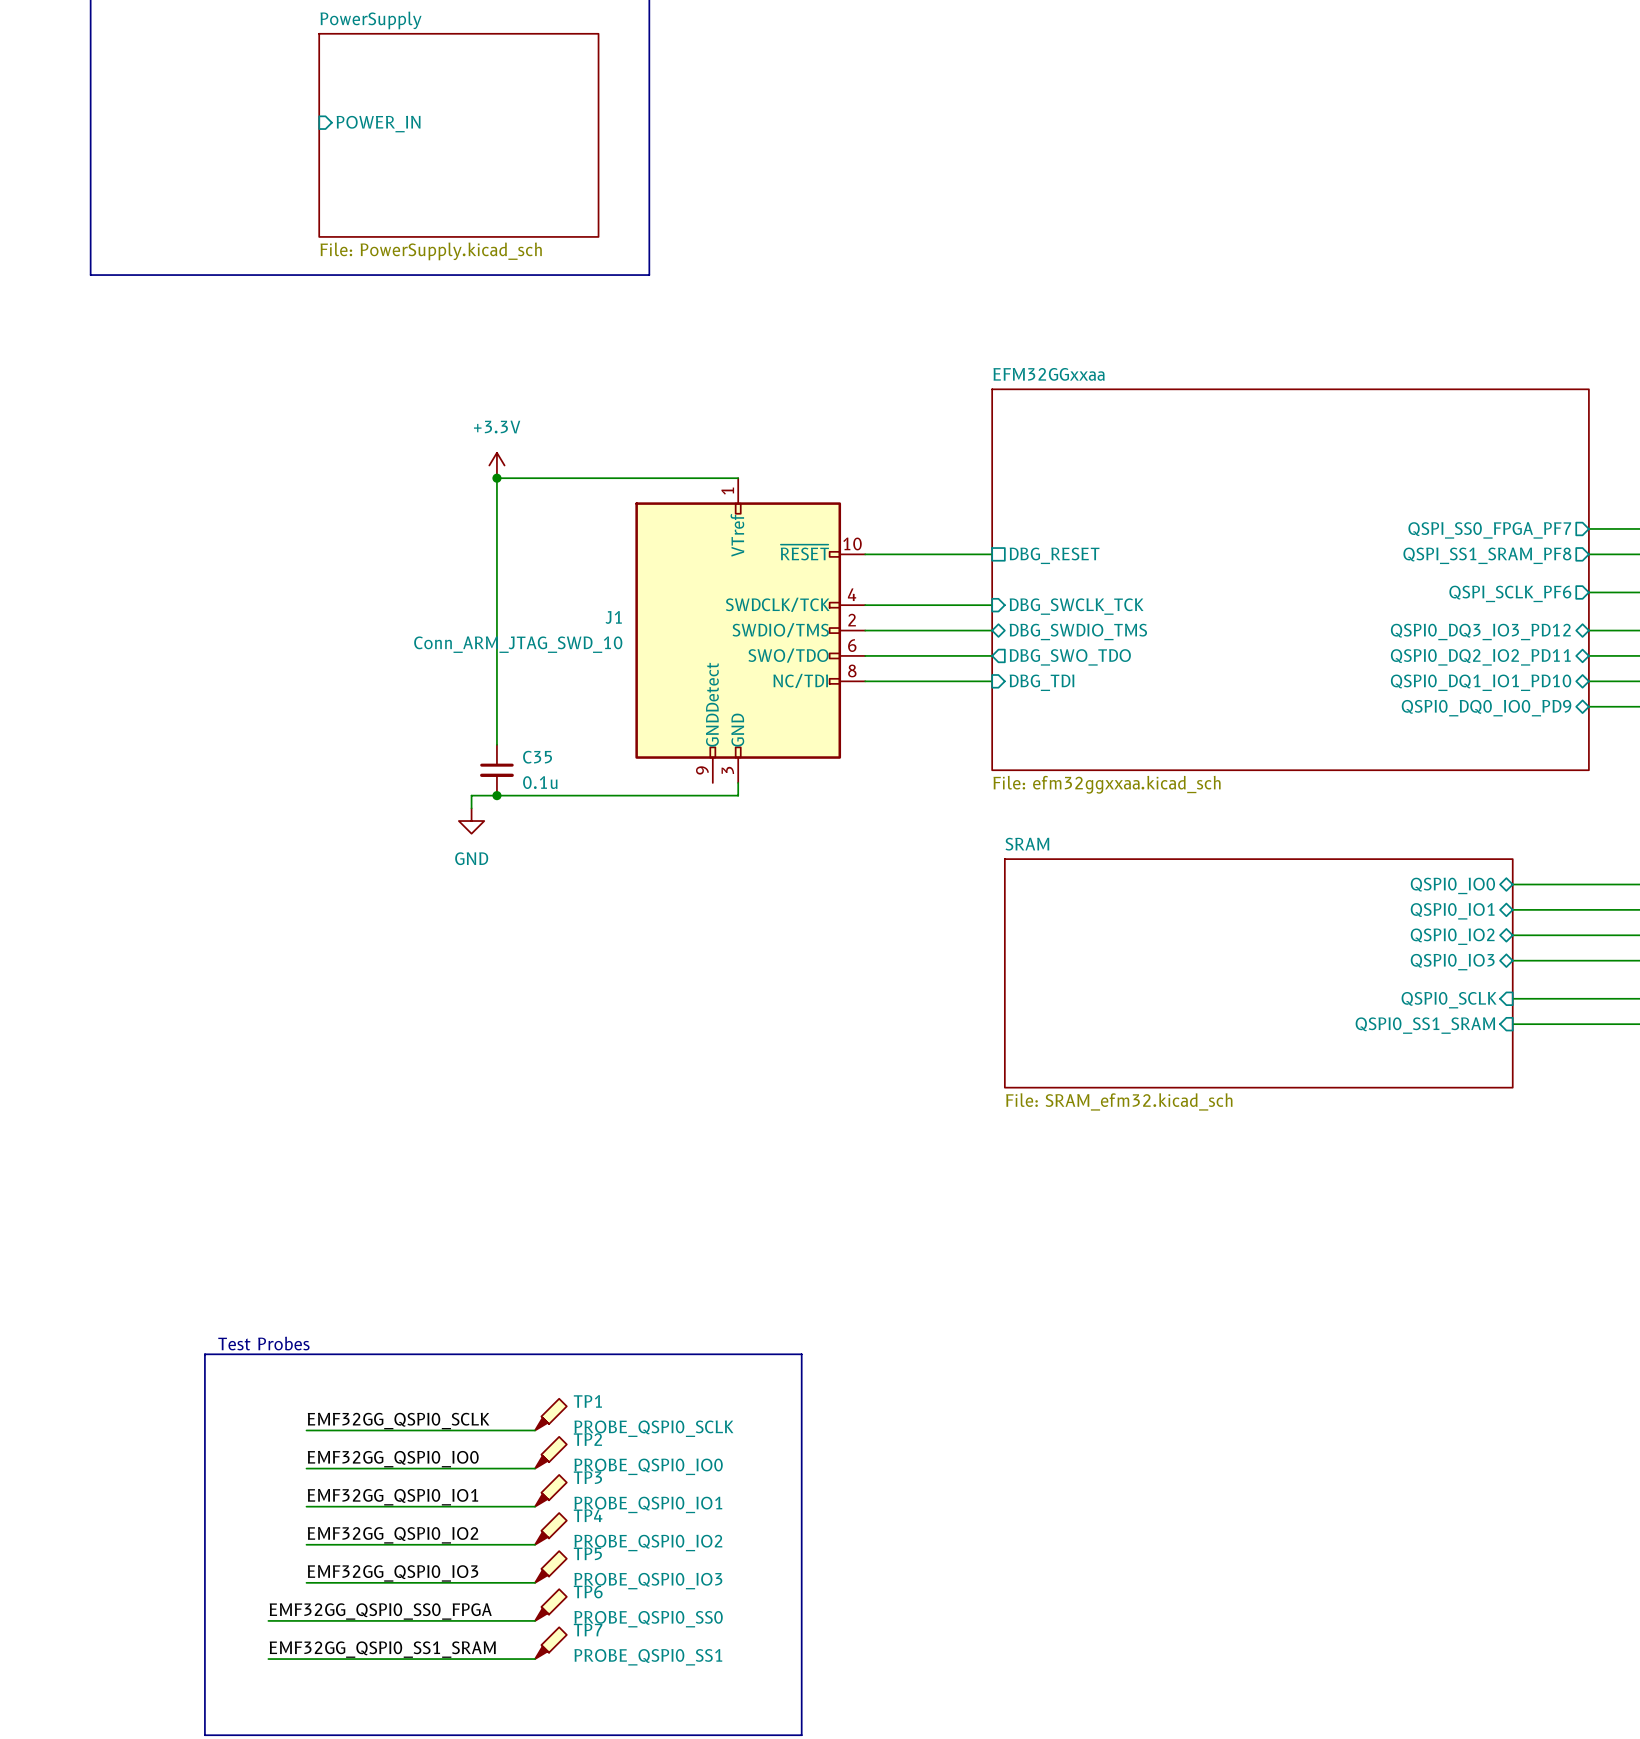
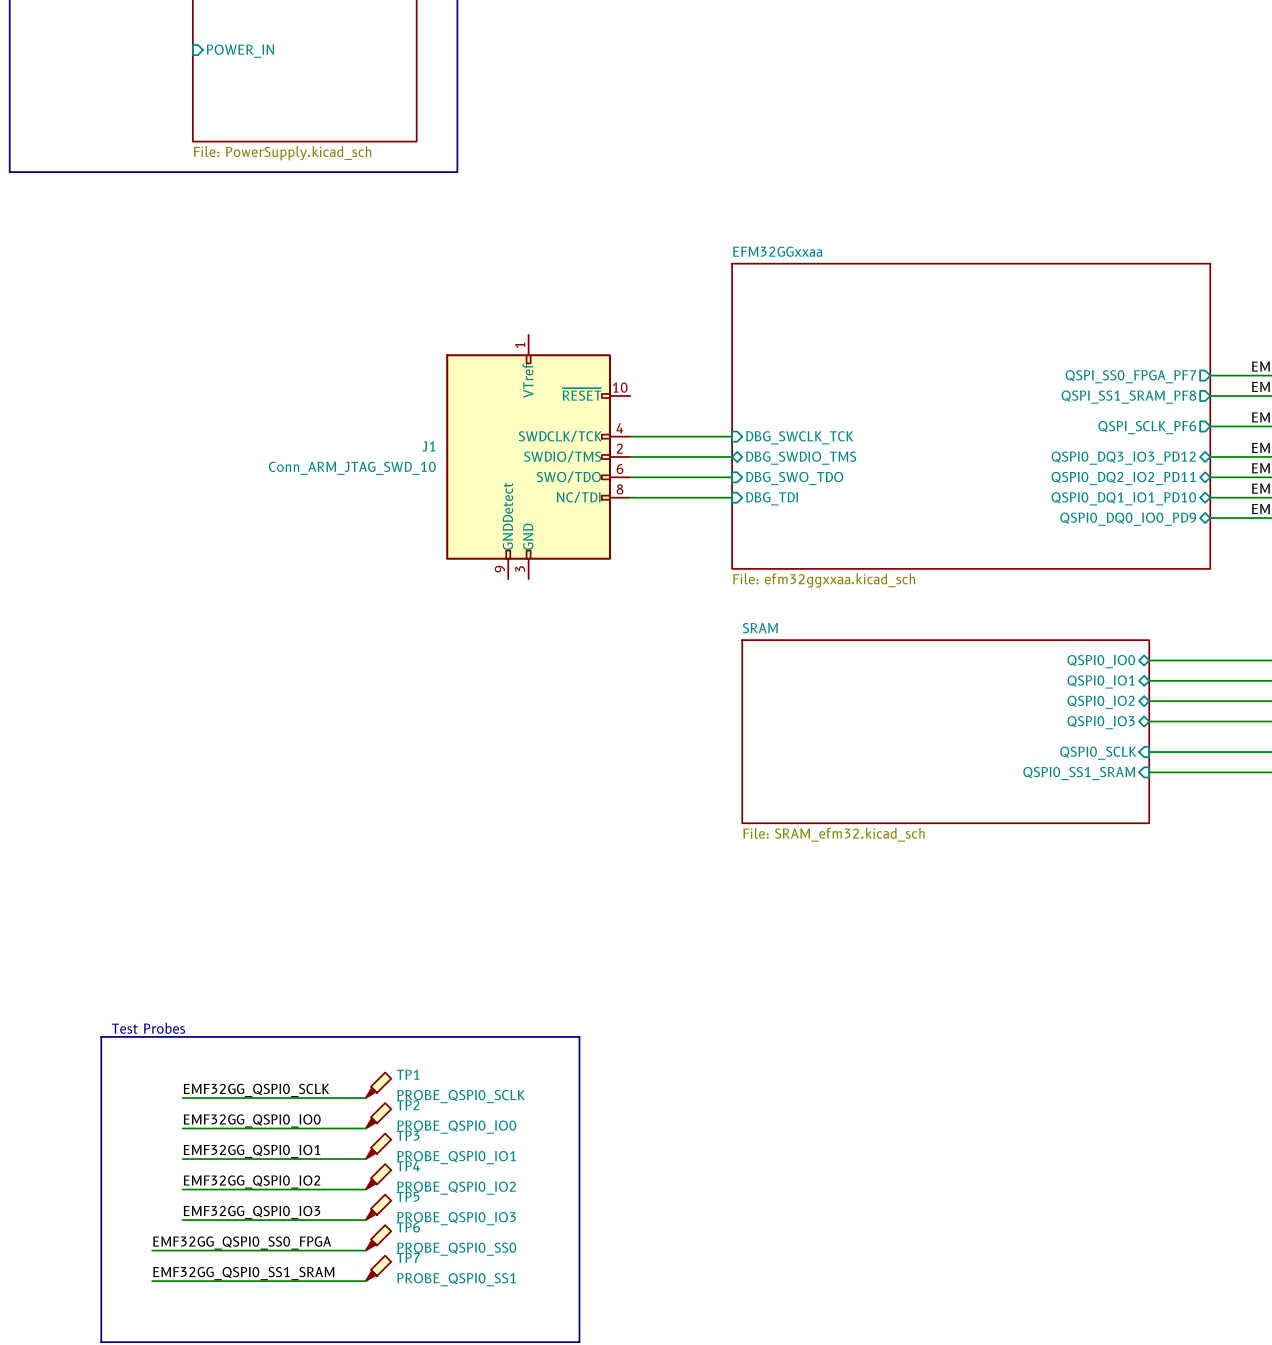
power symbol: +3.3V (496, 465) -> none
junction: (496, 478) -> none
wire: (738, 478) (496, 478) (496, 744) -> none
wire: (865, 554) (992, 554) -> none
sheet pin: DBG_RESET (1054, 555) -> none
sheet pin shape: output (1070, 657) -> input (794, 478)
C35: 0.1u (496, 770) -> none
wire: (738, 782) (738, 795) (471, 795) (471, 808) -> none
junction: (496, 795) -> none
power symbol: GND (471, 821) -> none

